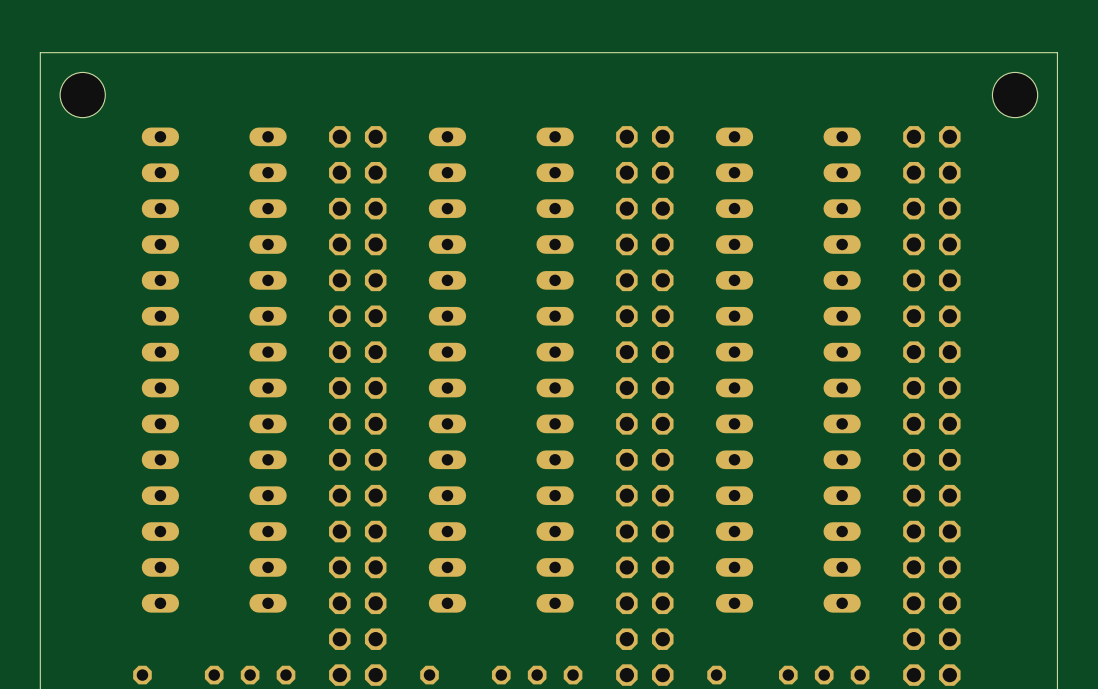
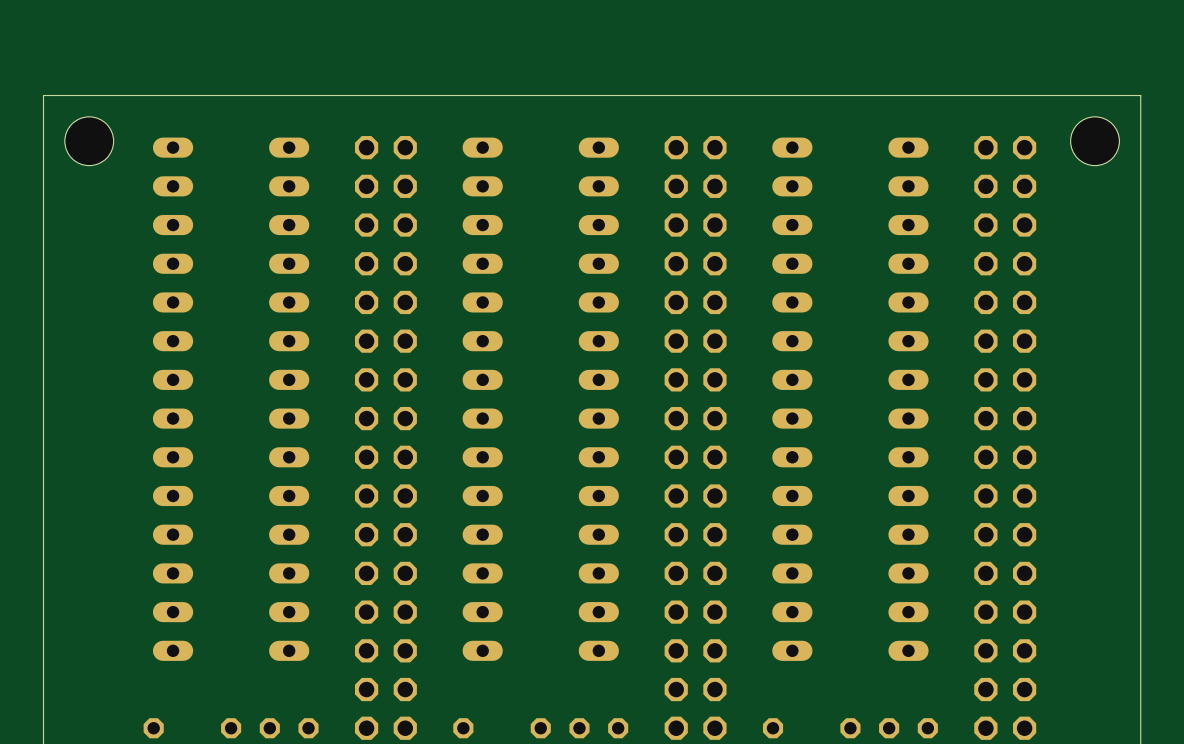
board edge: (1057, 88) (1057, 52) (40, 52) (40, 88) -> (1140, 95) (43, 95)
hole position: (82, 95) -> (89, 141)
hole position: (1015, 95) -> (1095, 141)

